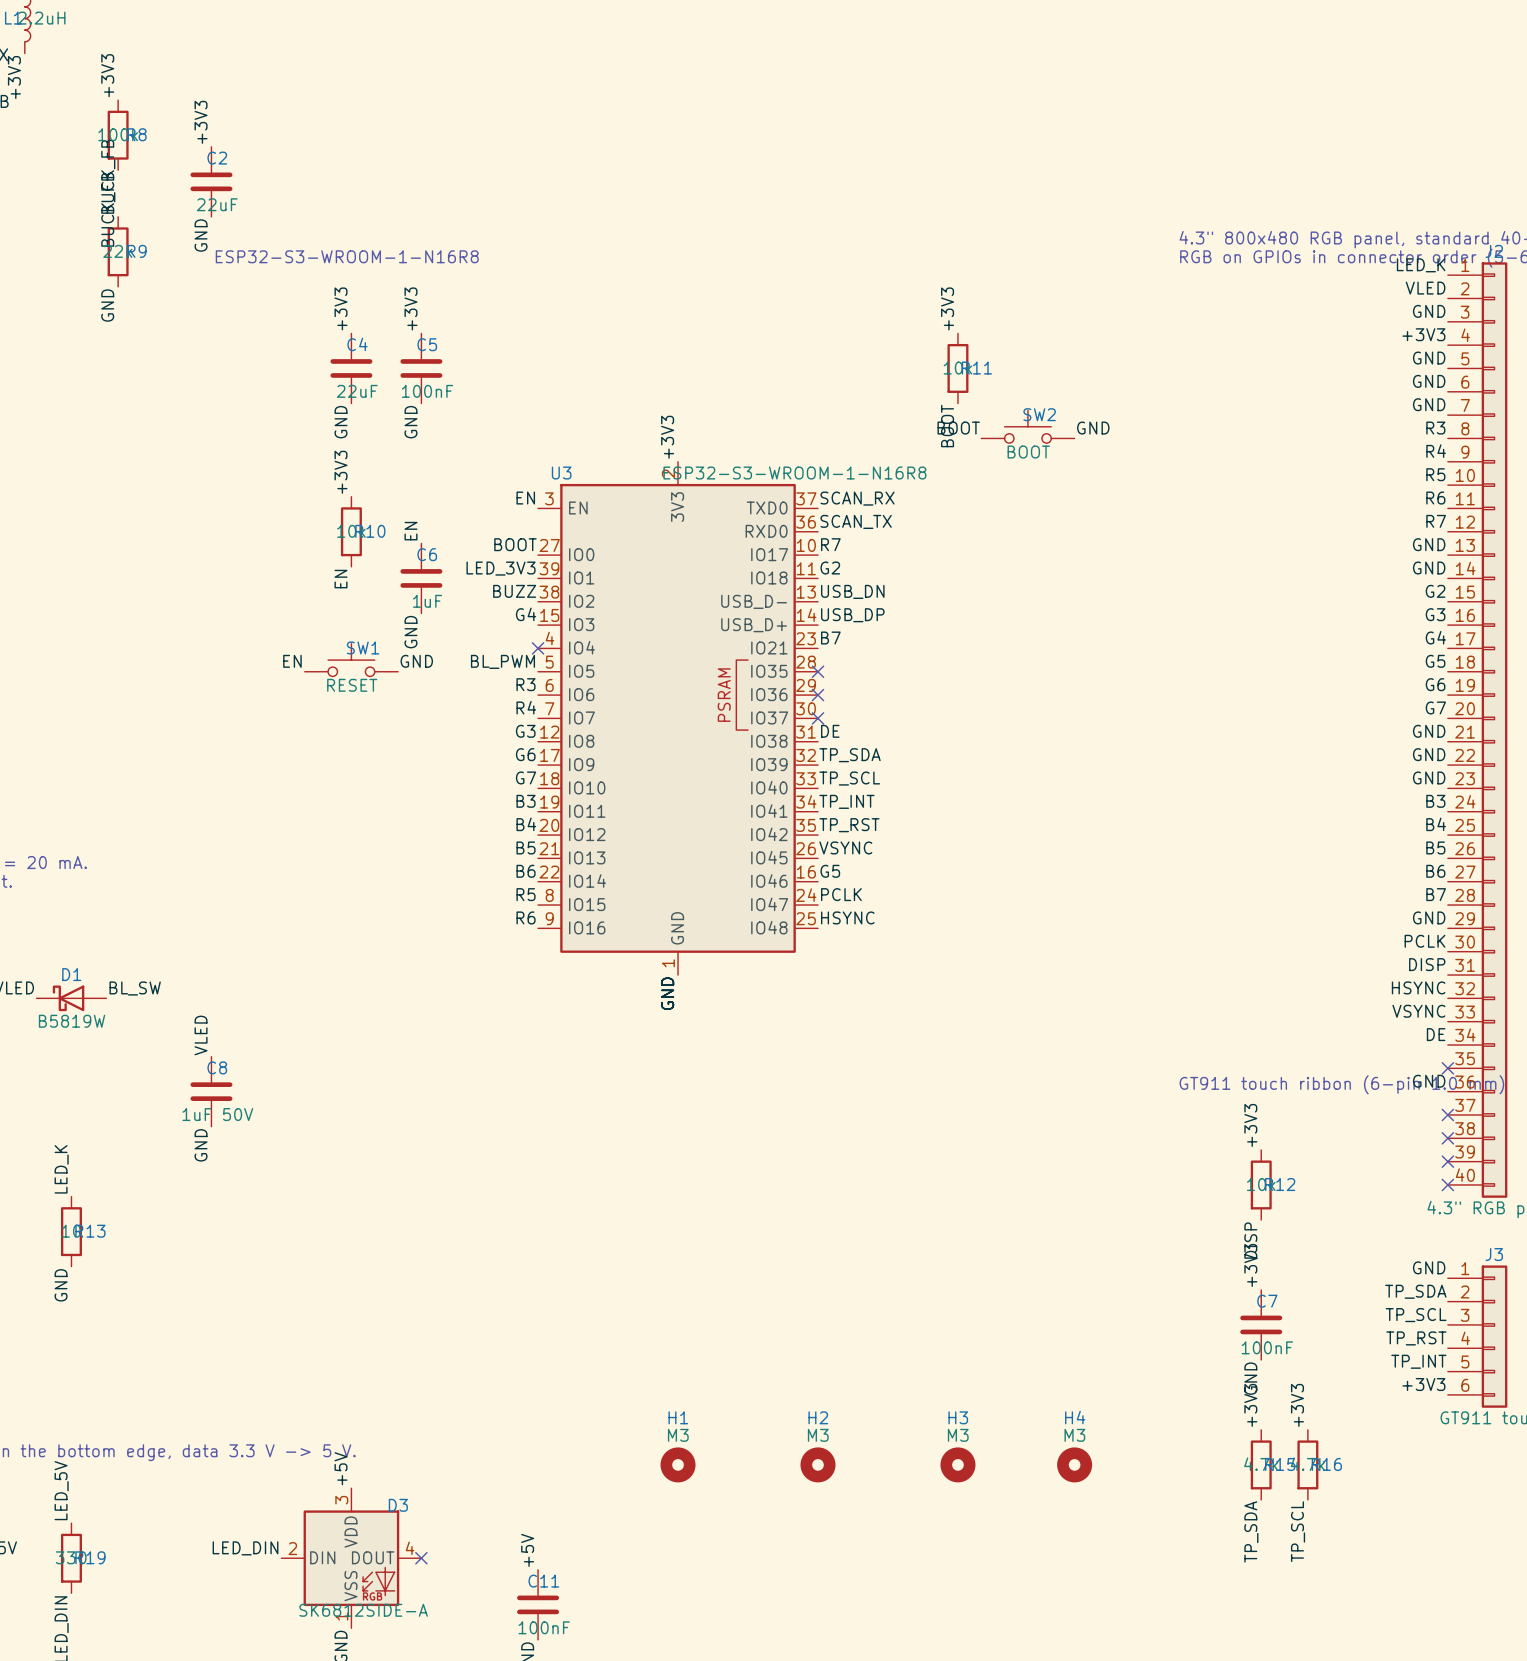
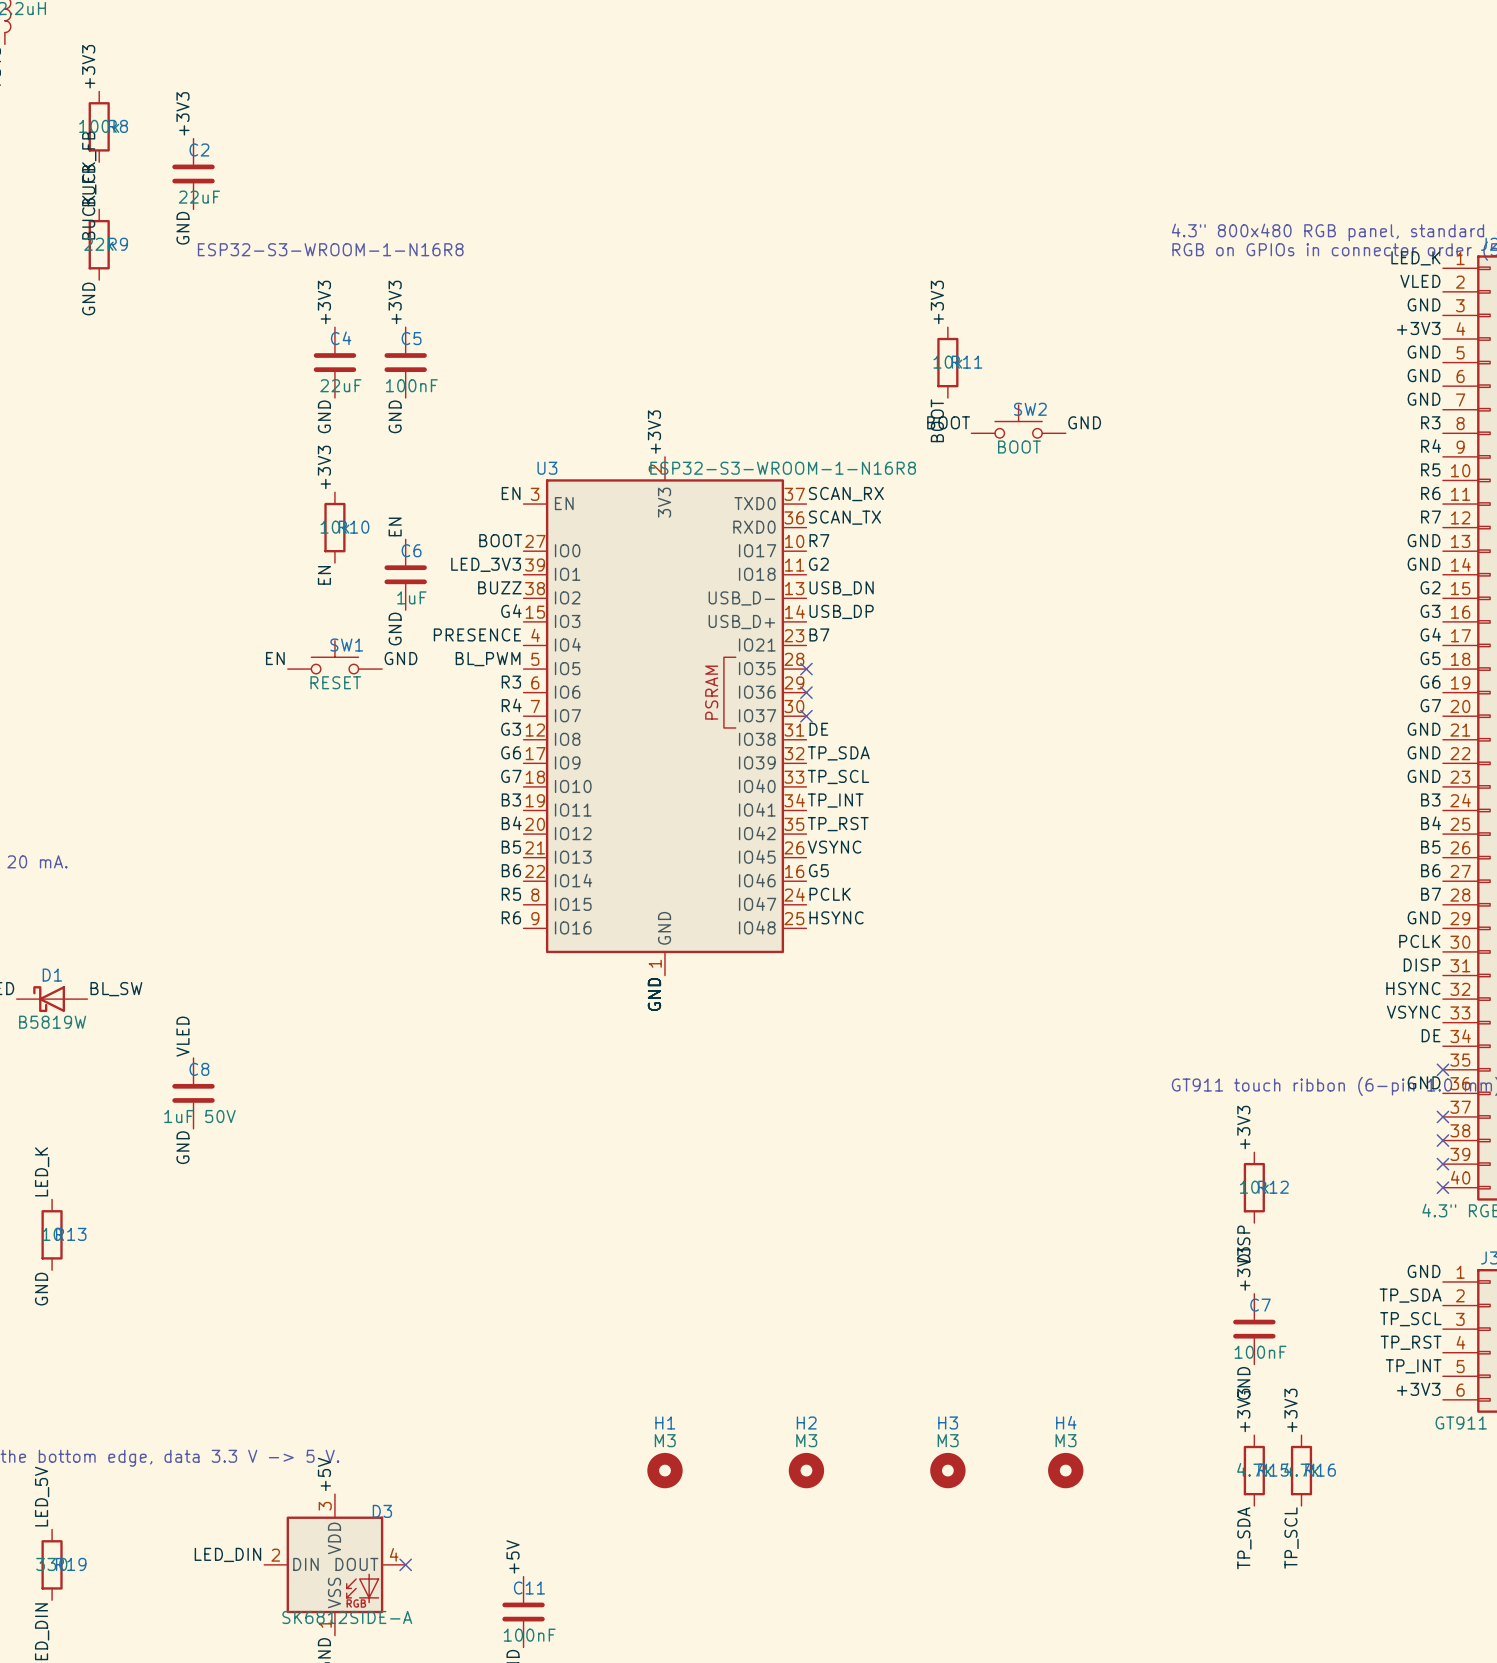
label: none -> PRESENCE (477, 634)
no-connect mark: (538, 648) -> none

